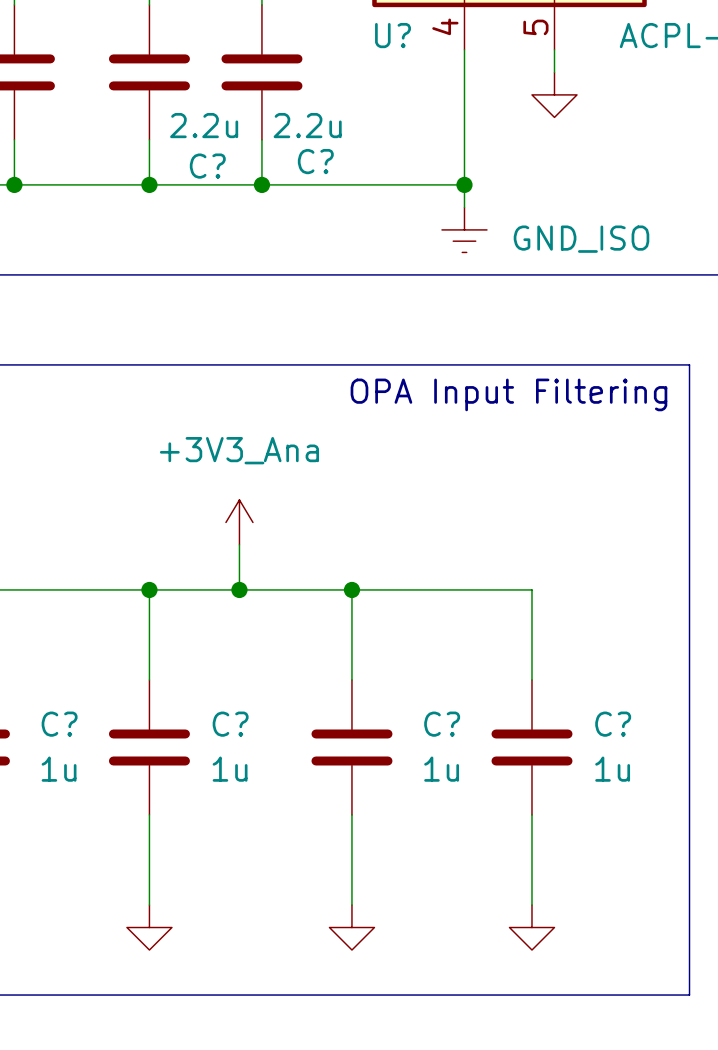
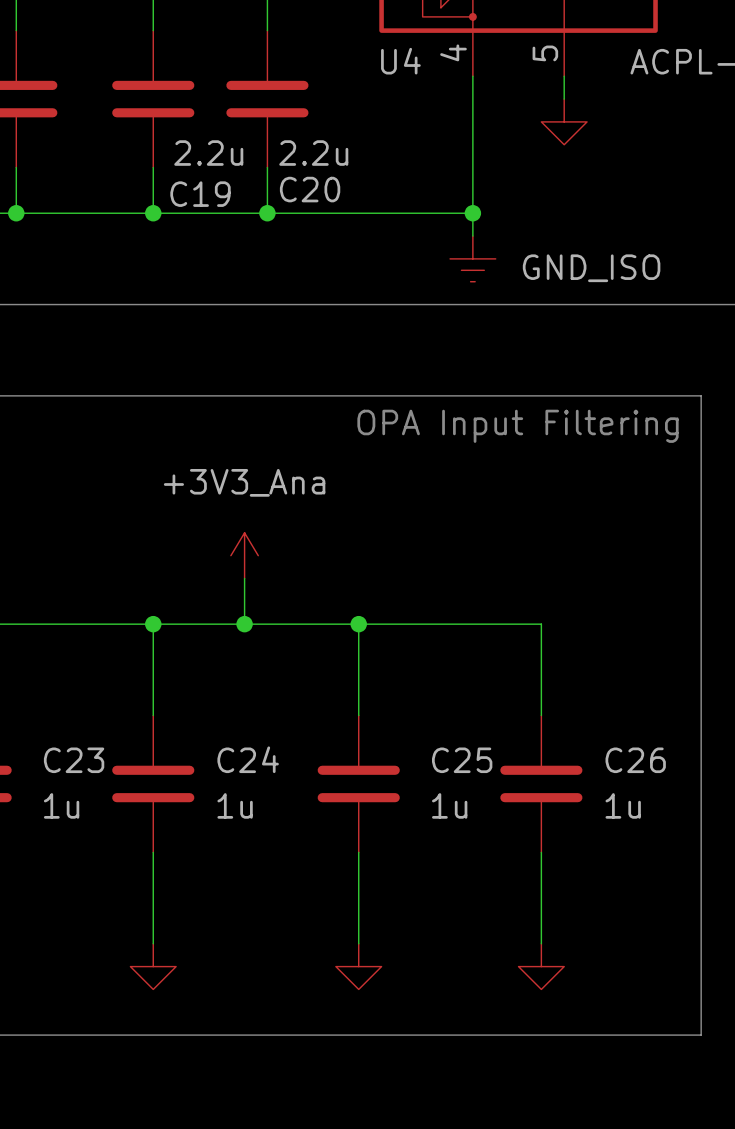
U? name: U? (393, 35) -> U4 (400, 61)
C? name: C? (315, 161) -> C20 (310, 189)
C? name: C? (207, 166) -> C19 (200, 194)
C? name: C? (59, 724) -> C23 (74, 760)
C? name: C? (230, 724) -> C24 (248, 759)
C? name: C? (442, 724) -> C25 (462, 760)
C? name: C? (613, 724) -> C26 (635, 760)

